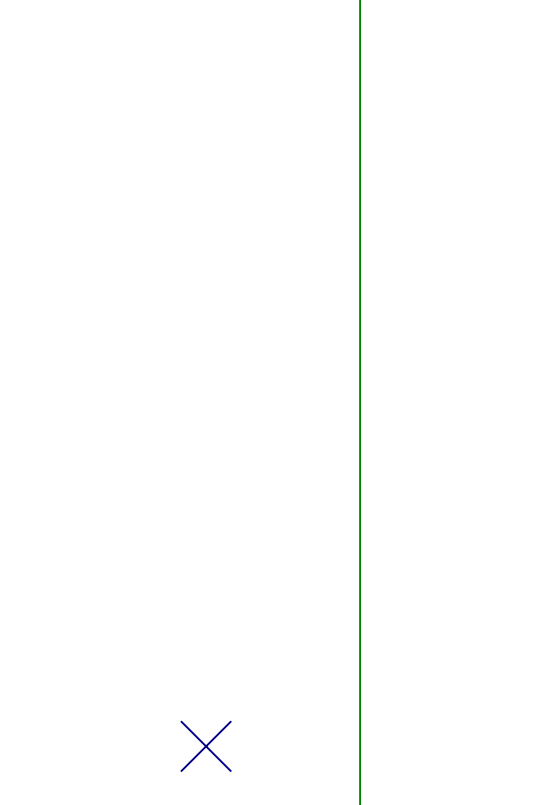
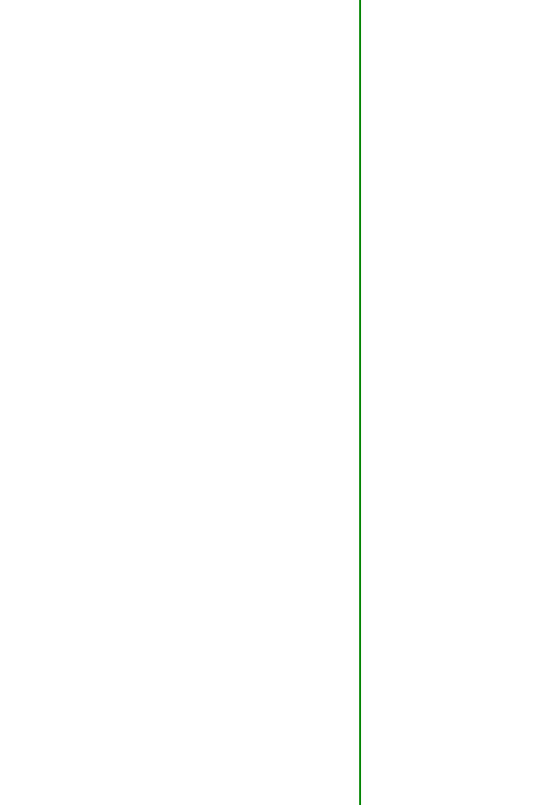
no-connect mark: (206, 746) -> none

